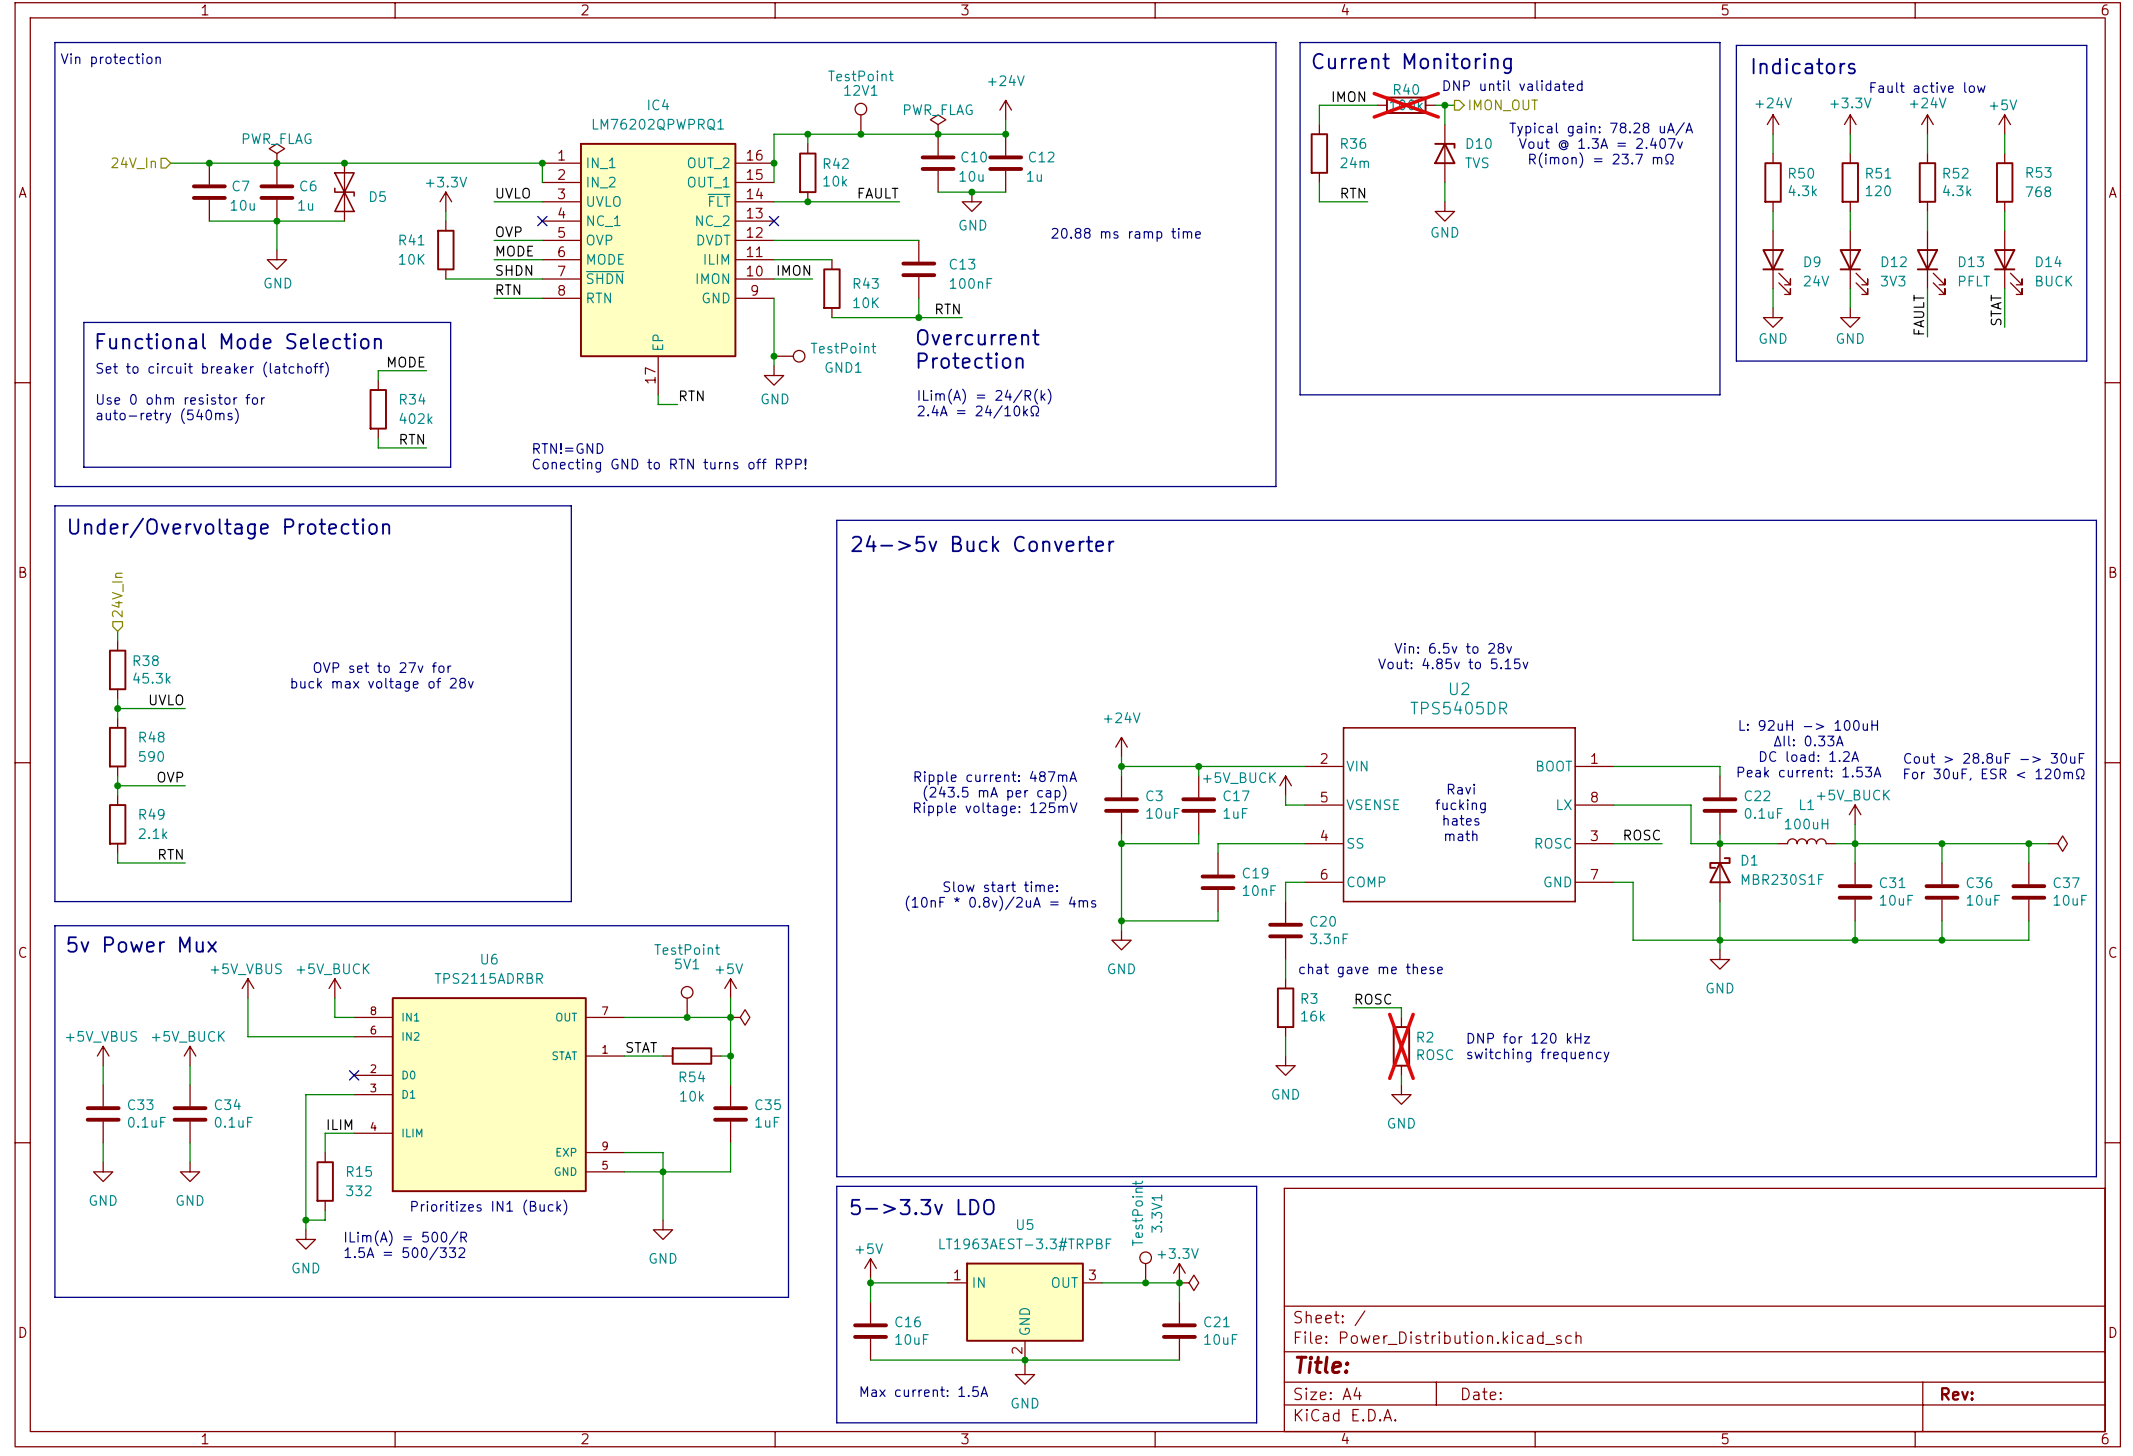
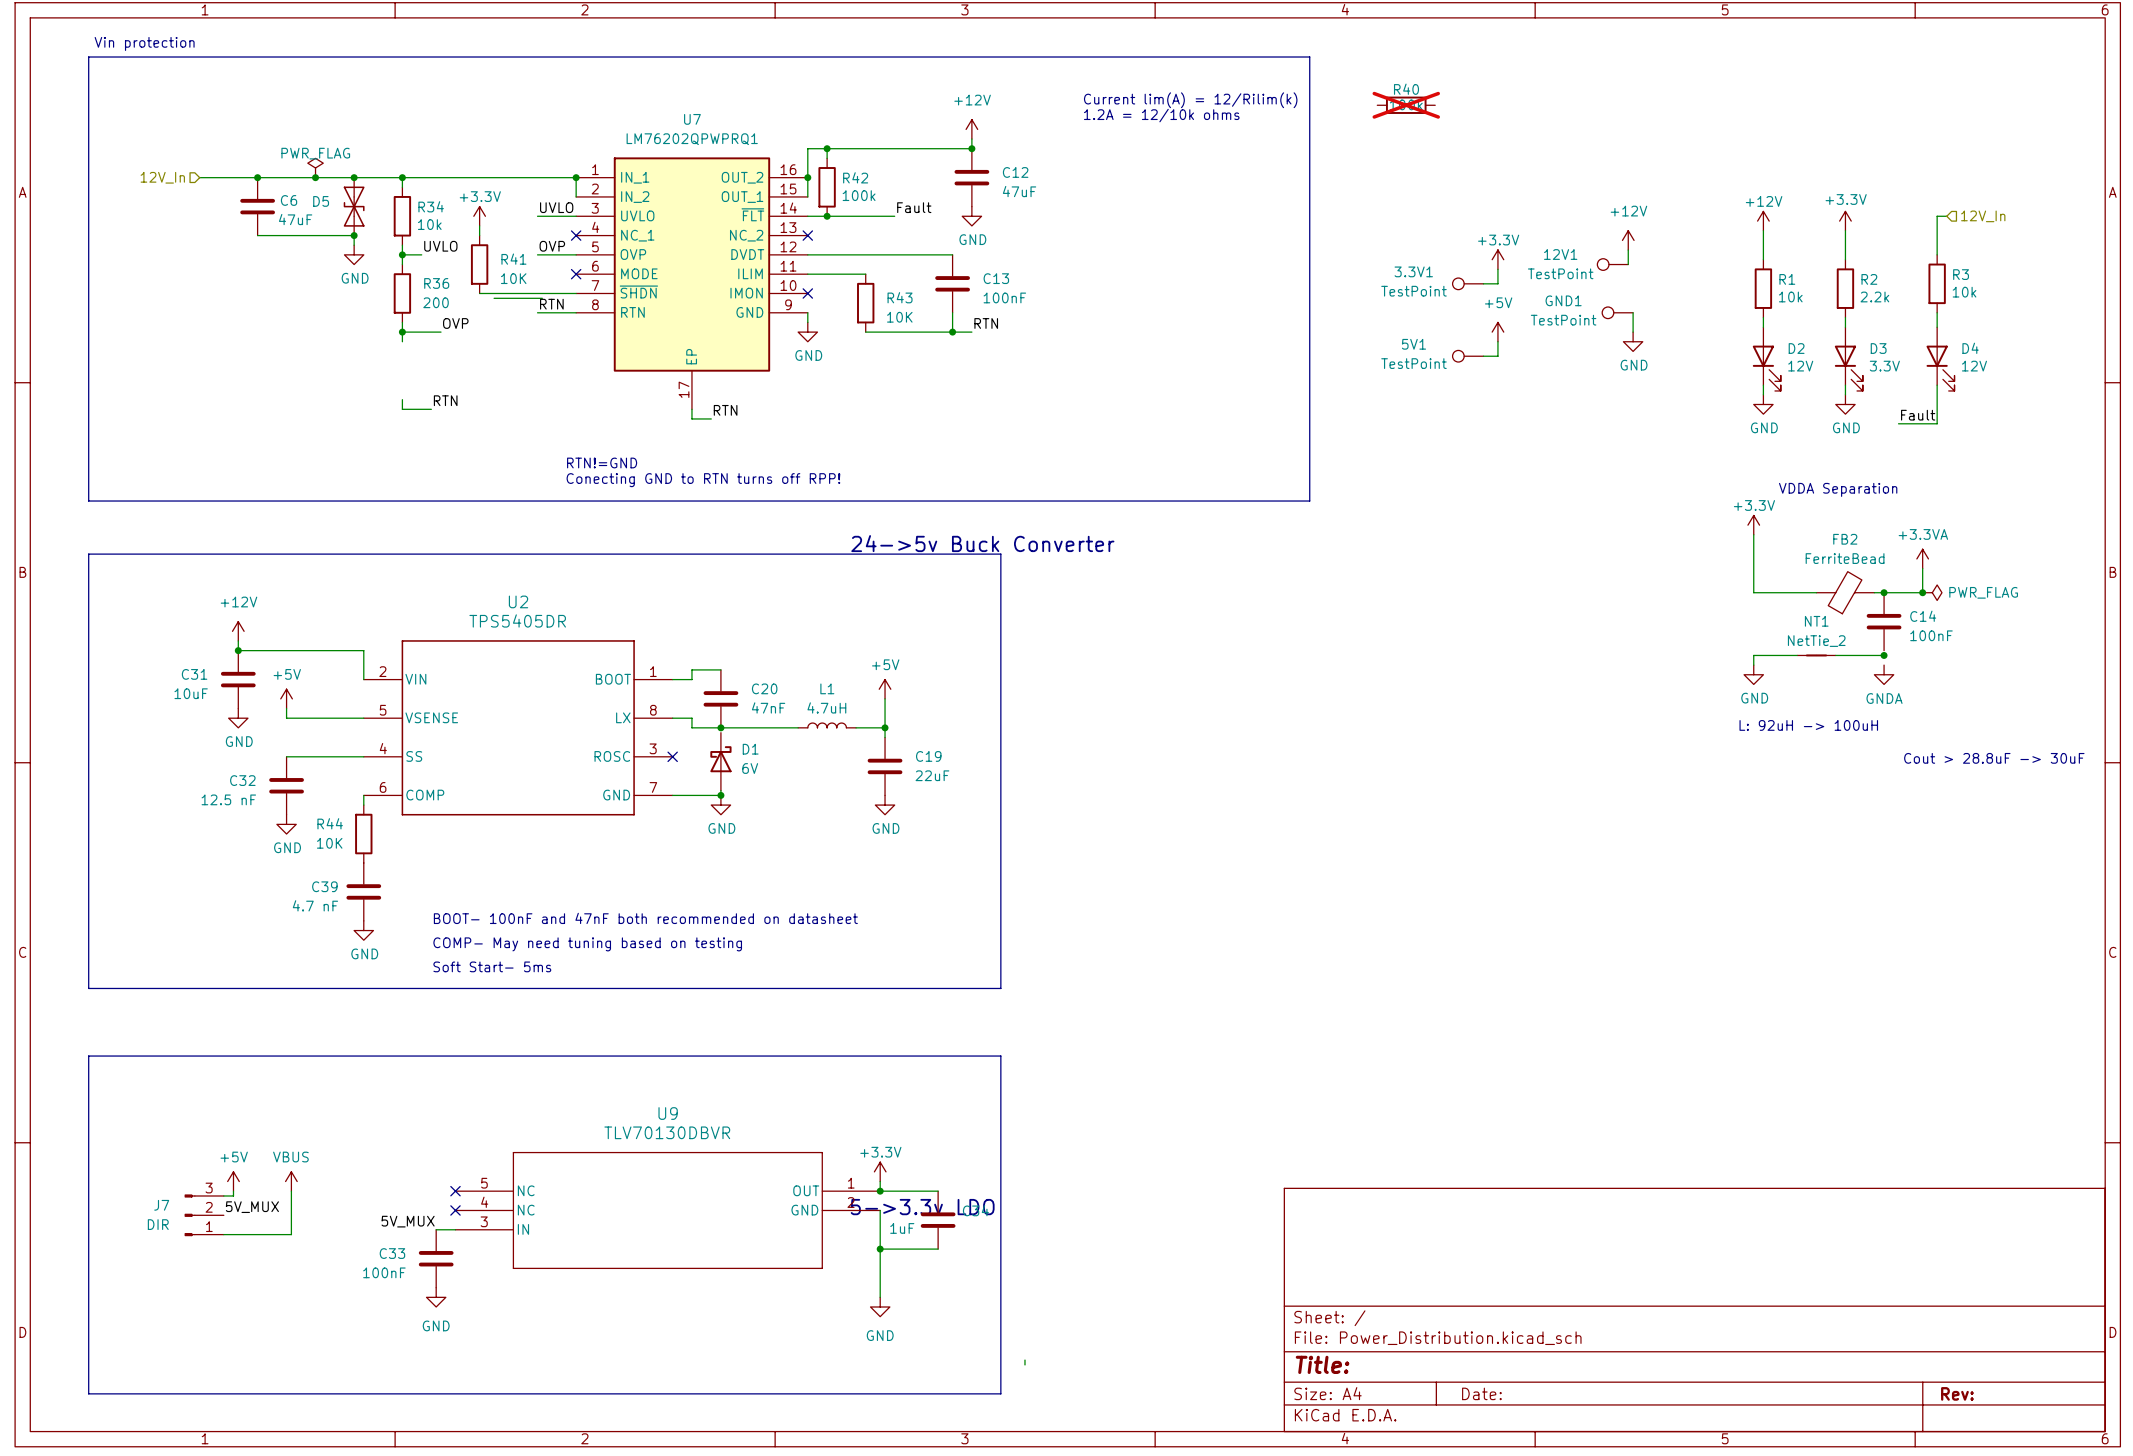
line: (54, 42) (54, 486) (1275, 486) (1275, 42) (54, 42) -> (88, 57) (88, 501) (1309, 501) (1309, 57) (88, 57)
line: (1300, 42) (1719, 42) (1719, 394) (1300, 394) (1300, 42) -> none
line: (1736, 45) (2086, 45) (2086, 361) (1736, 361) (1736, 45) -> none
text position: Vin protection (110, 60) -> Vin protection (144, 43)
text: Current Monitoring (1412, 63) -> none
text: Indicators (1804, 66) -> none
text: DNP until validated (1513, 85) -> none
text: Fault active low (1927, 87) -> none
12V1 name position: 12V1 (860, 90) -> 12V1 (1560, 254)
label: IMON (1348, 96) -> none
text: none -> Current lim(A) = 12/Rilim(k) (1190, 100)
wire: (1377, 105) (1319, 105) (1319, 124) -> none
wire: (1435, 105) (1454, 105) -> none
wire: (1444, 105) (1444, 124) -> none
junction: (1444, 105) -> none
hierarchical label: IMON_OUT (1503, 105) -> none
12V1 rotation: 0° (860, 109) -> 90° counterclockwise (1603, 264)
power symbol: +24V (1005, 110) -> none
text: none -> 1.2A = 12/10k ohms (1161, 115)
12V1 position: (860, 118) -> (1612, 264)
wire: (1005, 119) (1005, 134) (774, 134) (774, 182) -> none
power symbol: PWR_FLAG (938, 124) -> none
power symbol: +24V (1773, 124) -> none
power symbol position: +3.3V (1850, 124) -> +3.3V (1845, 221)
power symbol: +24V (1927, 124) -> none
power symbol: +5V (2004, 124) -> none
power symbol: none -> +12V (971, 129)
text: Typical gain: 78.28 uA/A (1601, 129) -> none
wire: (807, 134) (807, 143) -> (827, 148) (827, 158)
junction: (807, 134) -> none
junction: (860, 134) -> none
junction: (938, 134) -> none
junction: (1005, 134) -> none
wire: (1773, 134) (1773, 153) -> none
wire: (1850, 134) (1850, 153) -> none
wire: (1927, 134) (1927, 153) -> none
wire: (2004, 134) (2004, 153) -> none
wire: none -> (971, 139) (971, 148) (807, 148) (807, 196)
text: Vout @ 1.3A = 2.407v (1601, 144) -> none
junction: none -> (827, 148)
junction: none -> (971, 148)
power symbol position: PWR_FLAG (276, 153) -> PWR_FLAG (315, 168)
R36 position: (1319, 153) -> (402, 293)
D10: TVS (1444, 153) -> none
C12 name position: C12 (1041, 157) -> C12 (1015, 172)
text: R(imon) = 23.7 mΩ (1601, 160) -> none
R36 value: 24m (1354, 162) -> 200 (436, 302)
hierarchical label: 24V_In (133, 163) -> 12V_In (162, 177)
wire: (170, 163) (542, 163) (542, 182) -> none
junction: (209, 163) -> none
junction: (276, 163) -> none
junction: (344, 163) -> none
junction position: (542, 163) -> (576, 177)
junction: (774, 163) -> none
C10: 10u (938, 163) -> none
C12 position: (1005, 163) -> (971, 177)
R42 position: (807, 172) -> (827, 187)
C12 value: 1u (1034, 176) -> 47uF (1019, 191)
wire: none -> (199, 177) (576, 177) (576, 196)
junction: none -> (257, 177)
junction: none -> (315, 177)
junction: none -> (354, 177)
wire: none -> (402, 177) (402, 187)
junction: none -> (402, 177)
junction: none -> (807, 177)
R42 value: 10k (835, 181) -> 100k (859, 195)
wire: (1319, 182) (1319, 201) (1367, 201) -> none
wire: (1444, 182) (1444, 201) -> none
R50: 4.3k (1773, 182) -> none
R51: 120 (1850, 182) -> none
R52: 4.3k (1927, 182) -> none
R53: 768 (2004, 182) -> none
C7: 10u (209, 192) -> none
C6 position: (276, 192) -> (257, 206)
D5 position: (344, 192) -> (354, 206)
wire: (938, 192) (1005, 192) -> none
junction: (971, 192) -> none
label position: UVLO (513, 193) -> UVLO (556, 207)
label: FAULT (878, 193) -> none
label: RTN (1353, 193) -> none
D5 name position: D5 (377, 196) -> D5 (321, 201)
power symbol position: +3.3V (445, 201) -> +3.3V (479, 216)
wire: (494, 201) (542, 201) -> none
wire: (774, 201) (899, 201) -> none
junction: (807, 201) -> none
power symbol position: GND (971, 201) -> GND (971, 216)
C6 value: 1u (305, 205) -> 47uF (295, 219)
label: none -> Fault (914, 207)
wire: (445, 211) (445, 221) -> (479, 225) (479, 235)
power symbol: GND (1444, 211) -> none
wire: (1773, 211) (1773, 230) -> none
wire: (1850, 211) (1850, 230) -> none
wire: (1927, 211) (1927, 230) -> none
wire: (2004, 211) (2004, 230) -> none
wire: none -> (537, 216) (576, 216)
wire: none -> (807, 216) (894, 216)
junction: none -> (827, 216)
wire: none -> (1946, 216) (1937, 216) (1937, 254)
hierarchical label: none -> 12V_In (1983, 216)
wire: (209, 221) (344, 221) -> none
wire: (276, 221) (276, 250) -> none
junction: (276, 221) -> none
no-connect mark: (542, 221) -> none
no-connect mark position: (774, 221) -> (807, 235)
power symbol: none -> +12V (1763, 221)
wire: none -> (1763, 230) (1763, 259)
wire: none -> (1845, 230) (1845, 259)
label position: OVP (508, 231) -> OVP (552, 246)
text: 20.88 ms ramp time (1126, 234) -> none
wire: none -> (257, 235) (354, 235) (354, 245)
junction: none -> (354, 235)
no-connect mark: none -> (576, 235)
R41 name position: R41 (411, 239) -> R41 (513, 259)
wire: (494, 240) (542, 240) -> none
wire: (774, 240) (918, 240) -> (807, 254) (952, 254)
power symbol: none -> +12V (1628, 240)
label: none -> UVLO (440, 246)
R41 position: (445, 250) -> (479, 264)
wire: none -> (1628, 250) (1628, 264)
label: MODE (514, 251) -> none
wire: none -> (402, 254) (421, 254)
junction: none -> (402, 254)
wire: none -> (537, 254) (576, 254)
power symbol position: GND (276, 259) -> GND (354, 254)
R41 value position: 10K (411, 259) -> 10K (513, 278)
wire: (494, 259) (542, 259) -> none
wire: (774, 259) (831, 259) -> (807, 274) (865, 274)
power symbol: none -> +3.3V (1497, 259)
D9: 24V (1776, 262) -> none
D12: 3V3 (1853, 262) -> none
D13: PFLT (1930, 262) -> none
D14: BUCK (2008, 262) -> none
IC4: LM76202QPWPRQ1 (658, 268) -> none
C13 position: (918, 269) -> (952, 283)
wire: none -> (1497, 269) (1497, 283) (1483, 283)
label: SHDN (514, 270) -> none
label: IMON (793, 270) -> none
no-connect mark: none -> (576, 274)
wire: (445, 279) (542, 279) -> (479, 293) (576, 293)
wire: (774, 279) (812, 279) -> none
U7: none -> LM76202QPWPRQ1 (691, 283)
R43 position: (831, 288) -> (865, 303)
R1: none -> 10k (1763, 288)
wire: (1773, 288) (1773, 307) -> (1633, 312) (1633, 332)
wire: (1850, 288) (1850, 307) -> none
wire: (1927, 288) (1927, 336) -> none
wire: (2004, 288) (2004, 327) -> none
label position: RTN (508, 289) -> RTN (551, 304)
no-connect mark: none -> (807, 293)
wire: (774, 298) (774, 365) -> none
wire: (918, 298) (918, 317) -> (952, 312) (952, 332)
label position: RTN (947, 309) -> RTN (986, 323)
label: STAT (1996, 309) -> none
wire: none -> (537, 312) (576, 312)
wire: none -> (807, 312) (807, 322)
wire: none -> (1937, 312) (1937, 327)
label: FAULT (1918, 314) -> none
wire: (831, 317) (962, 317) -> none
junction position: (918, 317) -> (952, 332)
wire: none -> (1763, 317) (1763, 327)
power symbol: GND (1773, 317) -> none
wire: none -> (1845, 317) (1845, 327)
power symbol: GND (1850, 317) -> none
line: (83, 322) (450, 322) (450, 467) (83, 467) (83, 322) -> none
wire: none -> (402, 322) (402, 341)
label: none -> OVP (455, 323)
wire: none -> (402, 332) (441, 332)
junction: none -> (402, 332)
wire: none -> (865, 332) (971, 332)
power symbol: none -> +5V (1497, 332)
text: Overcurrent (978, 337) -> none
text: Functional Mode Selection (239, 341) -> none
wire: none -> (1497, 341) (1497, 356) (1483, 356)
power symbol: none -> GND (1633, 341)
junction: (774, 356) -> none
GND1 position: (789, 356) -> (1617, 312)
GND1 rotation: 0° (799, 356) -> 180° (1607, 312)
D2: none -> 12V (1766, 359)
D3: none -> 3.3V (1848, 359)
D4: none -> 12V (1940, 359)
text: Protection (970, 360) -> none
label: MODE (406, 362) -> none
text: Set to circuit breaker (latchoff) (212, 369) -> none
wire: (426, 370) (378, 370) (378, 380) -> none
power symbol position: GND (774, 375) -> GND (807, 332)
wire: none -> (1763, 385) (1763, 394)
wire: none -> (1845, 385) (1845, 394)
wire: none -> (1937, 385) (1937, 423) (1898, 423)
wire: (658, 394) (658, 404) (677, 404) -> (691, 409) (691, 418) (711, 418)
label position: RTN (691, 395) -> RTN (725, 410)
text: ILim(A) = 24/R(k) (984, 396) -> none
text: Use 0 ohm resistor for (180, 399) -> none
wire: none -> (402, 399) (402, 409) (431, 409)
R34 name position: R34 (412, 399) -> R34 (431, 206)
power symbol: none -> GND (1763, 404)
power symbol: none -> GND (1845, 404)
R34 position: (378, 409) -> (402, 216)
text: 2.4A = 24/10kΩ (978, 411) -> none
label: none -> Fault (1918, 415)
text: auto-retry (540ms) (167, 416) -> none
R34 value: 402k (416, 418) -> 10k (429, 224)
wire: (378, 438) (378, 447) (426, 447) -> none
label position: RTN (412, 439) -> RTN (445, 400)
text position: RTN!=GND (568, 448) -> RTN!=GND (602, 462)
text position: Conecting GND to RTN turns off RPP! (669, 465) -> Conecting GND to RTN turns off RPP! (703, 480)
text: none -> VDDA Separation (1838, 489)
line: (54, 505) (571, 505) (571, 901) (54, 901) (54, 505) -> none
line: (836, 520) (836, 1176) (2096, 1176) (2096, 520) (836, 520) -> none
power symbol: none -> +3.3V (1753, 525)
text: Under/Overvoltage Protection (229, 528) -> none
wire: none -> (1753, 534) (1753, 592) (1816, 592)
line: none -> (88, 554) (1000, 554) (1000, 988) (88, 988) (88, 554)
power symbol: none -> +3.3VA (1922, 558)
wire: none -> (1922, 568) (1922, 592) (1874, 592)
FB2: none -> FerriteBead (1845, 592)
junction: none -> (1884, 592)
junction: none -> (1922, 592)
power symbol: none -> PWR_FLAG (1932, 592)
hierarchical label: 24V_In (117, 595) -> none
C14: none -> 100nF (1884, 621)
wire: (117, 631) (117, 640) -> none
power symbol: none -> +12V (238, 631)
wire: none -> (238, 640) (238, 650) (363, 650) (363, 679)
text: Vin: 6.5v to 28v (1453, 648) -> none
junction: none -> (238, 650)
wire: none -> (1797, 655) (1753, 655) (1753, 665)
NT1: none -> NetTie_2 (1816, 655)
wire: none -> (1835, 655) (1884, 655)
junction: none -> (1884, 655)
text: Vout: 4.85v to 5.15v (1453, 663) -> none
text: OVP set to 27v for (382, 667) -> none
R38: 45.3k (117, 669) -> none
wire: none -> (720, 669) (691, 669) (691, 679) (672, 679)
power symbol: none -> GND (1753, 674)
power symbol: none -> GNDA (1884, 674)
text: buck max voltage of 28v (382, 684) -> none
power symbol: none -> +5V (885, 689)
wire: (117, 698) (117, 718) -> none
power symbol: none -> +5V (286, 698)
wire: none -> (885, 698) (885, 737)
label: UVLO (166, 699) -> none
wire: (117, 708) (185, 708) -> none
junction: (117, 708) -> none
wire: none -> (286, 708) (286, 718) (363, 718)
power symbol: none -> GND (238, 718)
wire: none -> (672, 718) (691, 718) (691, 727) (798, 727)
junction: none -> (720, 727)
wire: none -> (856, 727) (885, 727)
junction: none -> (885, 727)
text: ΔIl: 0.33A (1808, 740) -> none
R48: 590 (117, 747) -> none
power symbol: +24V (1121, 747) -> none
wire: none -> (286, 756) (363, 756)
no-connect mark: none -> (672, 756)
wire: (1121, 756) (1121, 776) -> none
text: DC load: 1.2A (1809, 756) -> none
wire: (1121, 766) (1304, 766) -> none
junction: (1121, 766) -> none
wire: (1198, 766) (1198, 776) -> none
junction: (1198, 766) -> none
wire: (1613, 766) (1719, 766) (1719, 776) -> none
text: Peak current: 1.53A (1809, 772) -> none
text: For 30uF, ESR < 120mΩ (1994, 774) -> none
wire: (117, 776) (117, 795) -> none
label: OVP (170, 777) -> none
text: Ripple current: 487mA (995, 778) -> none
wire: (117, 785) (185, 785) -> none
junction: (117, 785) -> none
C32: none -> 12.5 nF (286, 785)
power symbol: +5V_BUCK (1285, 785) -> none
text: Ravi (1461, 789) -> none
wire: none -> (720, 790) (720, 795) (672, 795)
text: (243.5 mA per cap) (995, 793) -> none
wire: none -> (363, 795) (363, 805)
junction: none -> (720, 795)
wire: (1285, 795) (1285, 805) (1304, 805) -> none
power symbol: none -> GND (720, 805)
power symbol: none -> GND (885, 805)
C3: 10uF (1121, 805) -> none
C17: 1uF (1198, 805) -> none
wire: (1613, 805) (1691, 805) (1691, 843) (1777, 843) -> none
C22: 0.1uF (1719, 805) -> none
text: fucking (1460, 806) -> none
text: Ripple voltage: 125mV (995, 809) -> none
U2 position: (1459, 814) -> (518, 727)
power symbol: +5V_BUCK (1855, 814) -> none
text: hates (1461, 820) -> none
R49: 2.1k (117, 824) -> none
power symbol: none -> GND (286, 824)
L1 value: 100uH (1806, 824) -> 4.7uH (826, 707)
wire: (1855, 824) (1855, 862) -> none
R44: none -> 10K (363, 834)
wire: (1121, 834) (1121, 930) -> none
wire: (1198, 834) (1198, 843) (1121, 843) -> none
wire: (1719, 834) (1719, 843) -> none
text: math (1461, 835) -> none
label: ROSC (1642, 835) -> none
L1 position: (1806, 841) -> (827, 725)
junction: (1121, 843) -> none
wire: (1304, 843) (1218, 843) (1218, 853) -> none
wire: (1613, 843) (1662, 843) -> none
junction: (1719, 843) -> none
wire: (1835, 843) (2048, 843) -> none
junction: (1855, 843) -> none
wire: (1941, 843) (1941, 862) -> none
junction: (1941, 843) -> none
wire: (2028, 843) (2028, 862) -> none
junction: (2028, 843) -> none
power symbol: (2057, 843) -> none
wire: (117, 853) (117, 862) (185, 862) -> none
label: RTN (170, 854) -> none
D1 position: (1719, 872) -> (720, 761)
C19 name position: C19 (1255, 873) -> C19 (928, 756)
D1 value: MBR230S1F (1782, 879) -> 6V (750, 768)
C19 position: (1218, 882) -> (885, 766)
wire: (1304, 882) (1285, 882) (1285, 901) -> none
wire: (1613, 882) (1633, 882) (1633, 940) (2028, 940) (2028, 920) -> none
C31 name position: C31 (1892, 882) -> C31 (194, 674)
text: Slow start time: (1000, 886) -> none
C19 value: 10nF (1259, 890) -> 22uF (932, 775)
C39: none -> 4.7 nF (363, 891)
C31 position: (1855, 891) -> (238, 679)
C36: 10uF (1941, 891) -> none
C37: 10uF (2028, 891) -> none
C31 value position: 10uF (1896, 900) -> 10uF (191, 693)
wire: (1719, 901) (1719, 949) -> none
text: (10nF * 0.8v)/2uA = 4ms (1001, 903) -> none
wire: (1218, 911) (1218, 920) (1121, 920) -> none
text: none -> BOOT- 100nF and 47nF both recommended on datasheet (645, 918)
junction: (1121, 920) -> none
wire: (1855, 920) (1855, 940) -> none
wire: (1941, 920) (1941, 940) -> none
C20 name position: C20 (1323, 921) -> C20 (764, 688)
line: (54, 925) (54, 1297) (788, 1297) (788, 925) (54, 925) -> none
power symbol: none -> GND (363, 930)
C20 position: (1285, 930) -> (720, 698)
C20 value: 3.3nF (1329, 938) -> 47nF (768, 707)
power symbol: GND (1121, 940) -> none
junction: (1719, 940) -> none
junction: (1855, 940) -> none
junction: (1941, 940) -> none
text: 5v Power Mux (142, 944) -> none
text: none -> COMP- May need tuning based on testing (587, 944)
wire: (1285, 959) (1285, 978) -> none
power symbol: GND (1719, 959) -> none
5V1 name position: 5V1 (687, 963) -> 5V1 (1413, 344)
text: none -> Soft Start- 5ms (492, 966)
text: chat gave me these (1371, 970) -> none
power symbol: +5V_VBUS (247, 988) -> none
power symbol: +5V_BUCK (334, 988) -> none
power symbol: +5V (730, 988) -> none
5V1 rotation: 0° (687, 992) -> 90° counterclockwise (1458, 356)
wire: (247, 998) (247, 1036) (354, 1036) -> none
wire: (334, 998) (334, 1017) (354, 1017) -> none
wire: (730, 998) (730, 1084) -> none
label: ROSC (1373, 999) -> none
5V1 position: (687, 1001) -> (1468, 356)
R3 position: (1285, 1007) -> (1937, 283)
wire: (1353, 1007) (1401, 1007) (1401, 1017) -> none
R3 value: 16k (1312, 1016) -> 10k (1964, 292)
wire: (624, 1017) (730, 1017) -> none
junction: (687, 1017) -> none
junction: (730, 1017) -> none
power symbol: (740, 1017) -> none
wire: (1285, 1036) (1285, 1056) -> none
text: DNP for 120 kHz (1528, 1038) -> none
R2 position: (1401, 1046) -> (1845, 288)
R2 do-not-place cross: (1401, 1046) -> none
label: STAT (641, 1047) -> none
R2 value: ROSC (1435, 1054) -> 2.2k (1874, 296)
text: switching frequency (1538, 1055) -> none
line: none -> (88, 1056) (88, 1393) (1000, 1393) (1000, 1056) (88, 1056)
power symbol: +5V_VBUS (103, 1056) -> none
power symbol: +5V_BUCK (190, 1056) -> none
R54: 10k (691, 1056) -> none
junction: (730, 1056) -> none
wire: (103, 1065) (103, 1084) -> none
wire: (190, 1065) (190, 1084) -> none
power symbol: GND (1285, 1065) -> none
no-connect mark: (354, 1075) -> none
wire: (1401, 1075) (1401, 1084) -> none
wire: (354, 1094) (305, 1094) (305, 1229) -> none
U6: TPS2115ADRBR (489, 1094) -> none
power symbol: GND (1401, 1094) -> none
C33 name position: C33 (140, 1104) -> C33 (392, 1253)
C33 position: (103, 1113) -> (436, 1258)
C34 position: (190, 1113) -> (938, 1220)
C35: 1uF (730, 1113) -> none
C33 value: 0.1uF (146, 1122) -> 100nF (384, 1272)
C34 value: 0.1uF (233, 1122) -> 1uF (902, 1228)
label: ILIM (339, 1124) -> none
wire: (354, 1133) (325, 1133) (325, 1152) -> none
wire: (103, 1142) (103, 1162) -> none
wire: (190, 1142) (190, 1162) -> none
wire: (730, 1142) (730, 1171) (624, 1171) -> none
wire: (624, 1152) (663, 1152) (663, 1220) -> none
power symbol: GND (103, 1171) -> none
power symbol: GND (190, 1171) -> none
junction: (663, 1171) -> none
power symbol: none -> +3.3V (880, 1171)
power symbol: none -> +5V (233, 1181)
power symbol: none -> VBUS (291, 1181)
R15: 332 (325, 1181) -> none
wire: none -> (880, 1181) (880, 1191) (938, 1191)
line: (836, 1186) (1256, 1186) (1256, 1422) (836, 1422) (836, 1186) -> none
wire: none -> (233, 1191) (233, 1195) (223, 1195)
wire: none -> (291, 1191) (291, 1234) (223, 1234)
no-connect mark: none -> (455, 1191)
junction: none -> (880, 1191)
label: none -> 5V_MUX (252, 1207)
text: Prioritizes IN1 (Buck) (489, 1207) -> none
wire: (325, 1210) (325, 1220) (305, 1220) -> none
no-connect mark: none -> (455, 1210)
U9: none -> TLV70130DBVR (667, 1210)
wire: none -> (880, 1210) (880, 1297)
J7: none -> DIR (204, 1215)
junction: (305, 1220) -> none
label: none -> 5V_MUX (408, 1221)
wire: none -> (436, 1229) (455, 1229)
power symbol: GND (663, 1229) -> none
text: ILim(A) = 500/R (406, 1238) -> none
power symbol: GND (305, 1239) -> none
wire: none -> (880, 1249) (938, 1249)
text: 1.5A = 500/332 (404, 1253) -> none
3.3V1 rotation: 0° (1145, 1257) -> 90° counterclockwise (1458, 283)
3.3V1 position: (1145, 1267) -> (1468, 283)
power symbol: +5V (870, 1268) -> none
power symbol: +3.3V (1179, 1273) -> none
wire: (870, 1278) (870, 1302) -> none
wire: (870, 1282) (947, 1282) -> none
junction position: (870, 1282) -> (880, 1249)
wire: (1102, 1282) (1179, 1282) (1179, 1302) -> none
junction: (1145, 1282) -> none
junction: (1179, 1282) -> none
power symbol: (1189, 1282) -> none
power symbol: none -> GND (436, 1297)
power symbol: none -> GND (880, 1307)
U5: LT1963AEST-3.3#TRPBF (1024, 1311) -> none
C16: 10uF (870, 1331) -> none
C21: 10uF (1179, 1331) -> none
wire: (870, 1360) (1179, 1360) -> none
junction: (1024, 1360) -> none
power symbol: GND (1024, 1374) -> none
text: Max current: 1.5A (924, 1391) -> none

